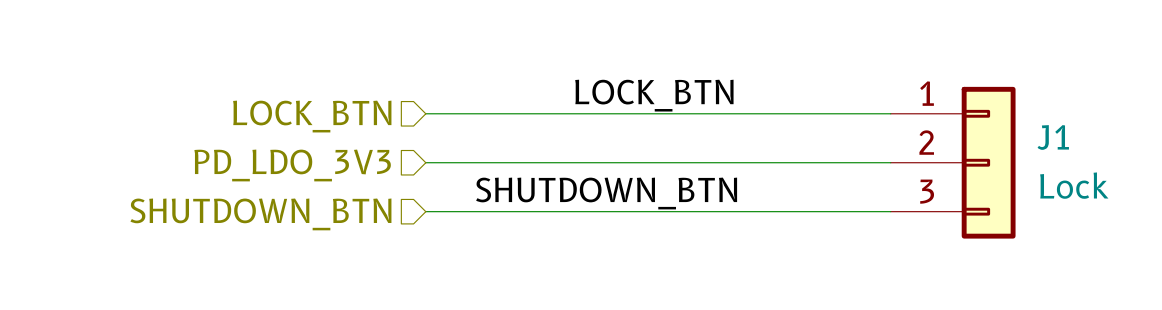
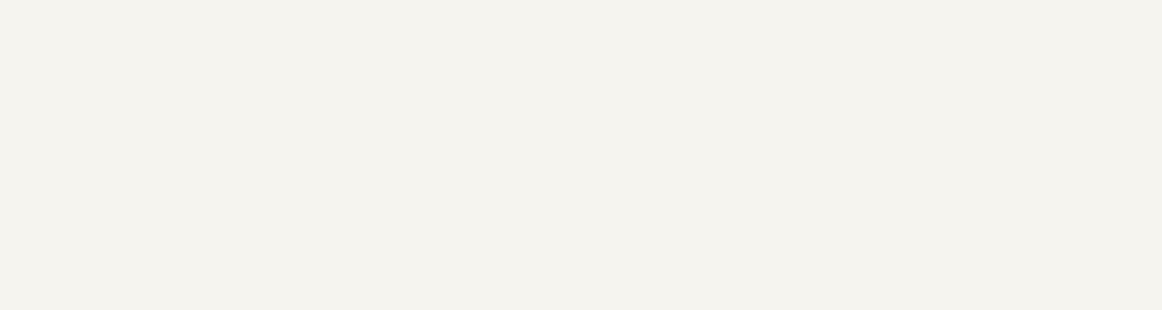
label: LOCK_BTN (654, 95) -> none
wire: (425, 113) (890, 113) -> none
hierarchical label: LOCK_BTN (312, 116) -> none
wire: (425, 162) (890, 162) -> none
J1: Lock (953, 162) -> none
hierarchical label: PD_LDO_3V3 (292, 165) -> none
label: SHUTDOWN_BTN (606, 193) -> none
wire: (425, 211) (890, 211) -> none
hierarchical label: SHUTDOWN_BTN (260, 214) -> none

